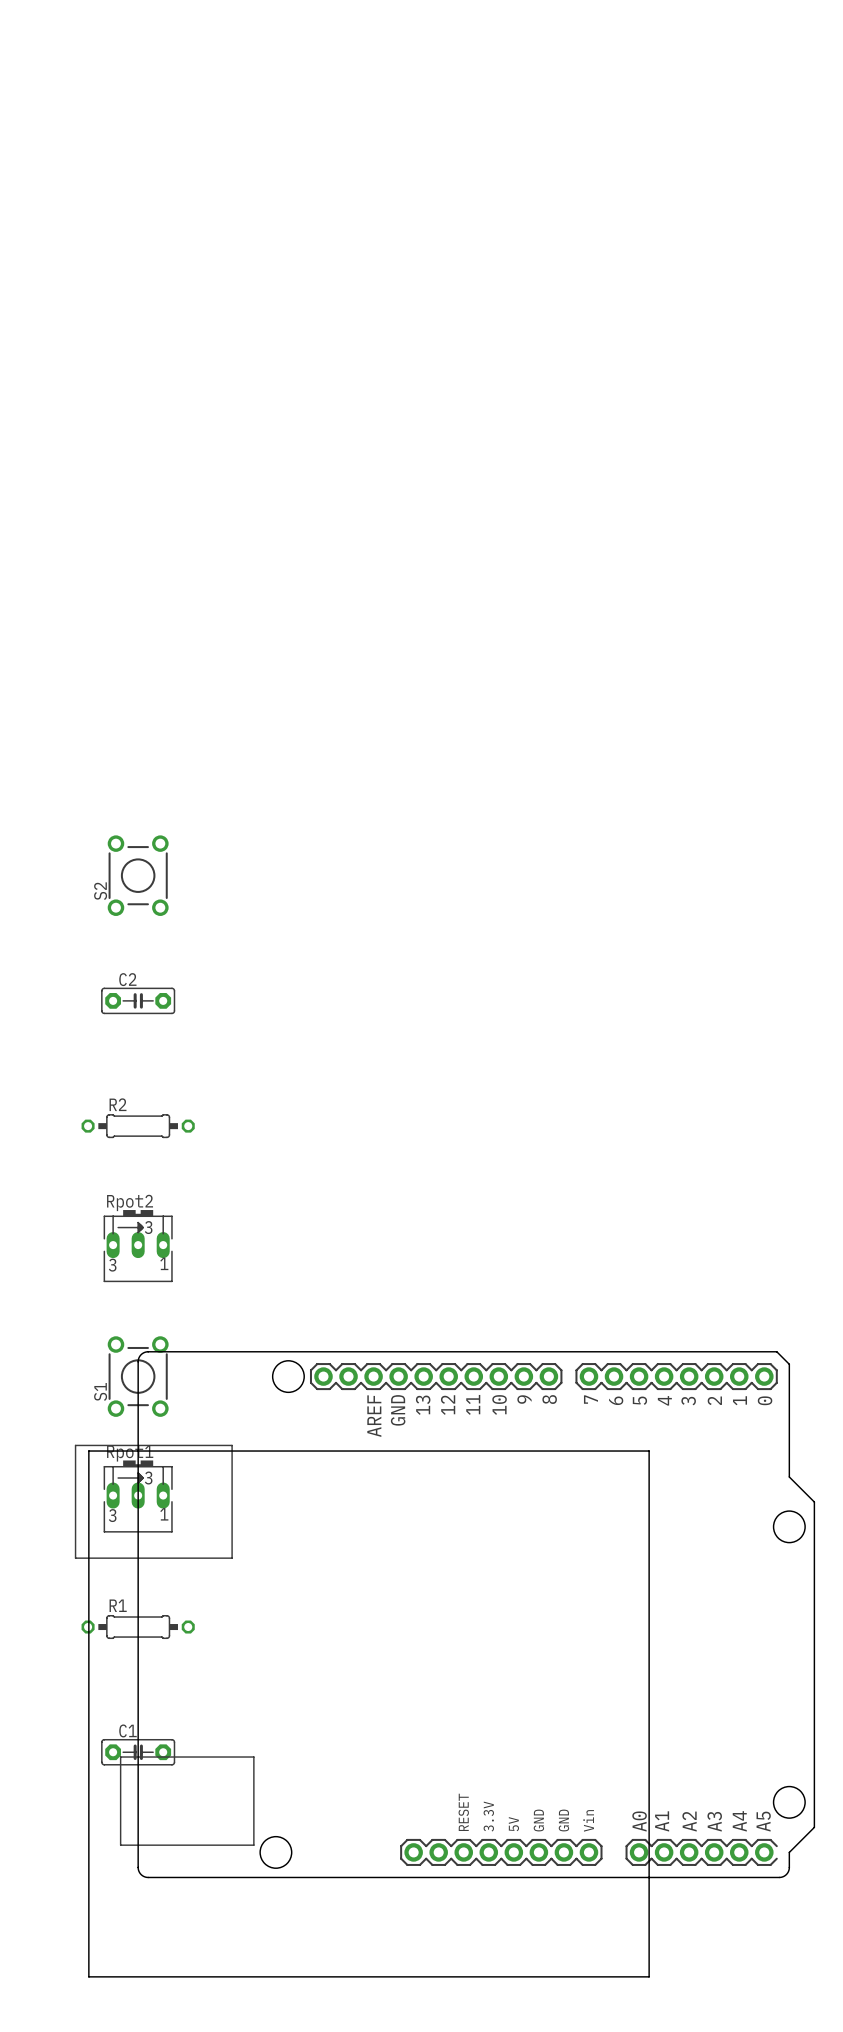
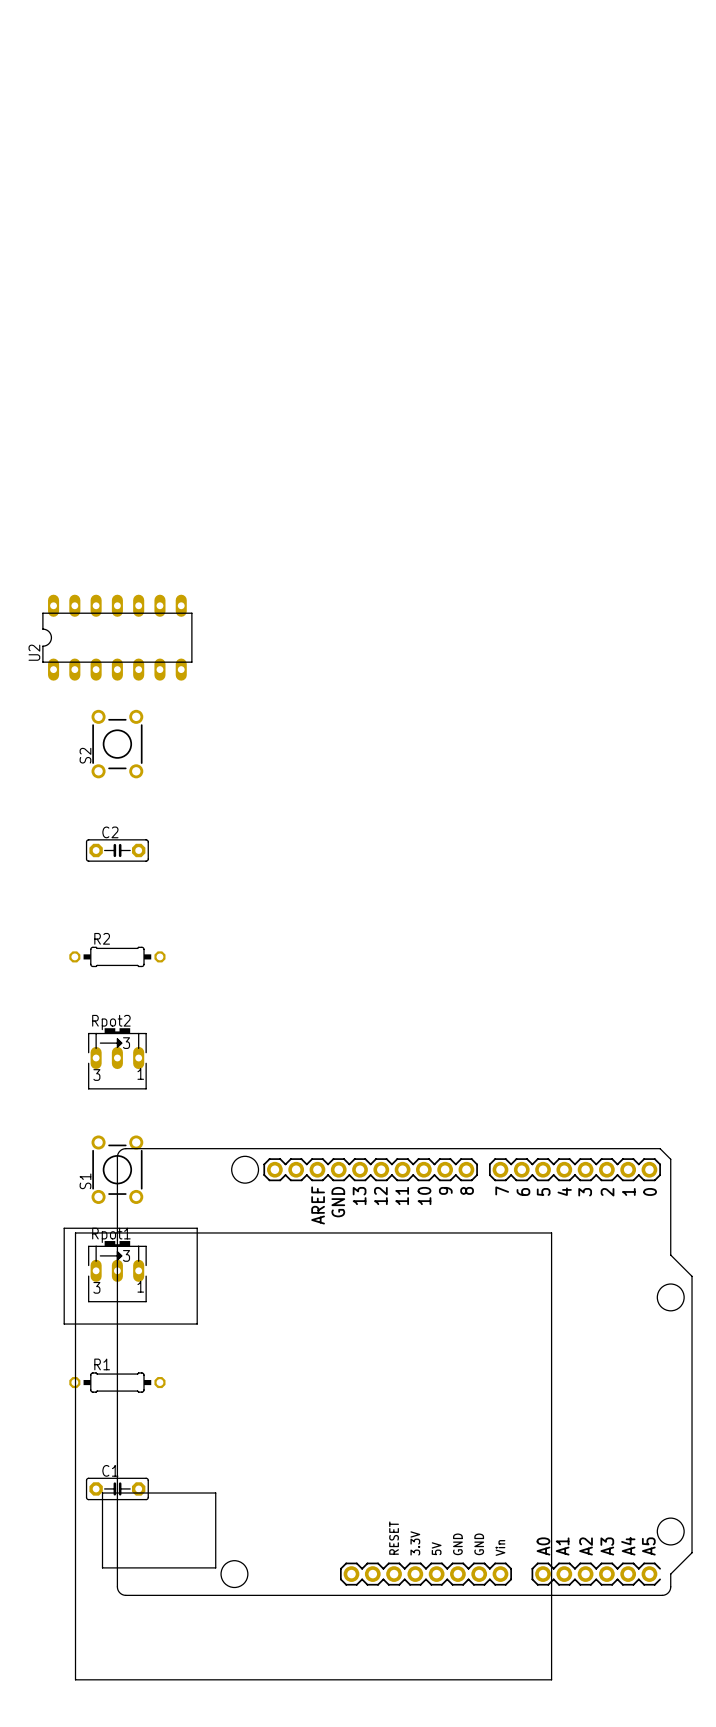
U2: none -> (117, 637)

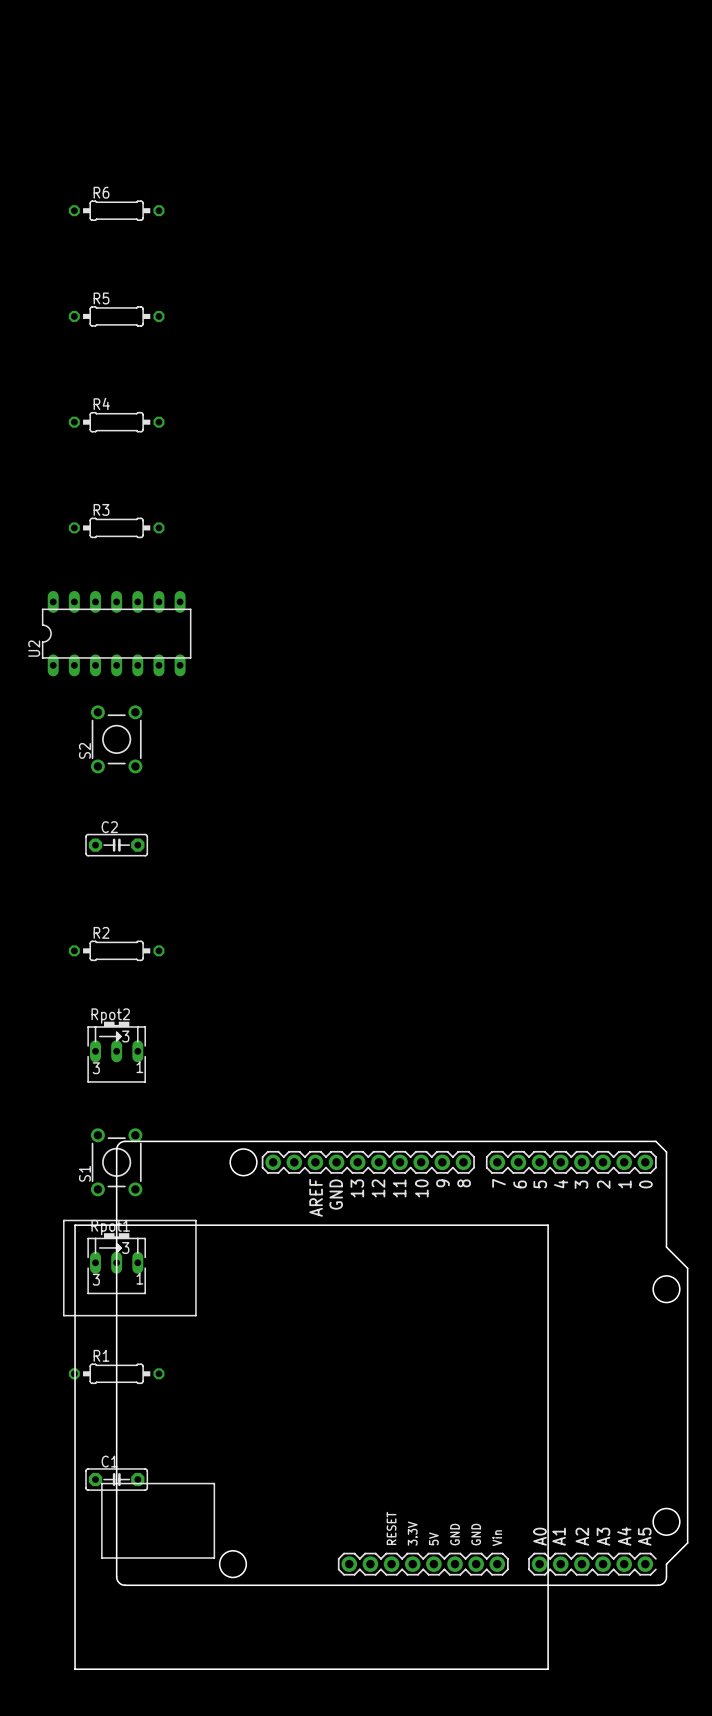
R6: none -> (116, 210)
R5: none -> (116, 316)
R4: none -> (116, 422)
R3: none -> (116, 527)

